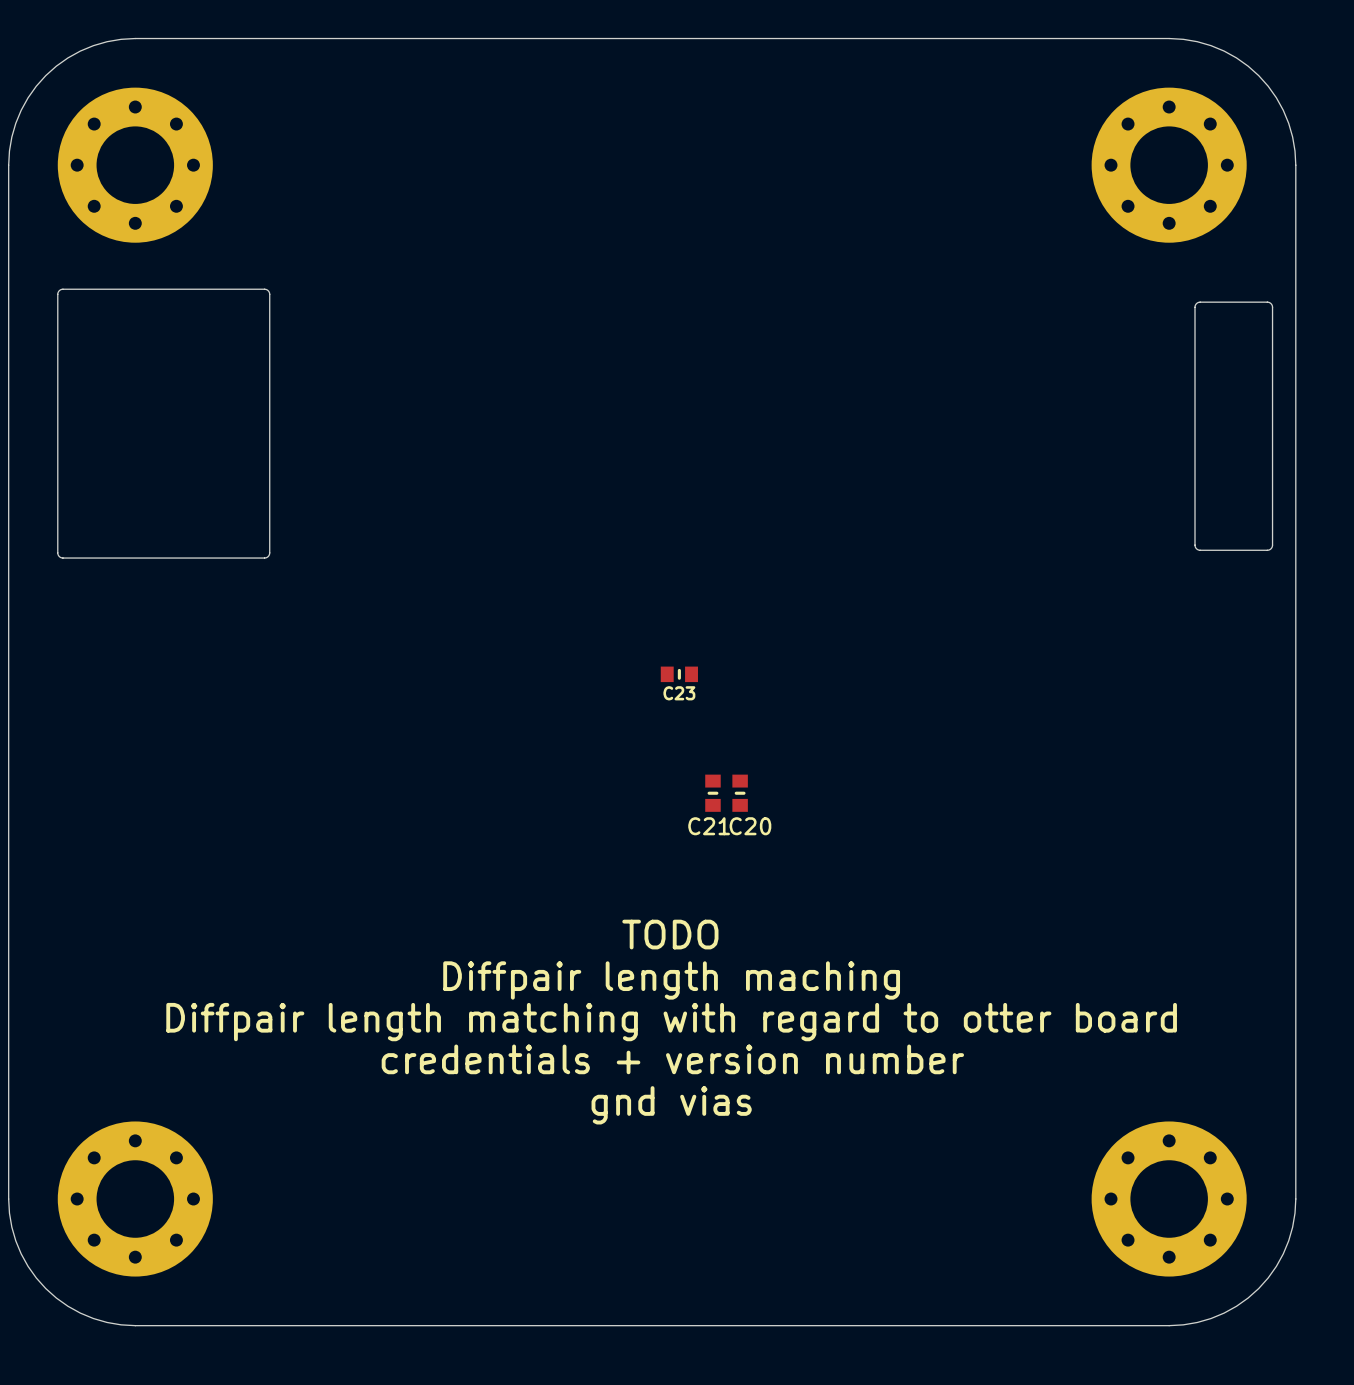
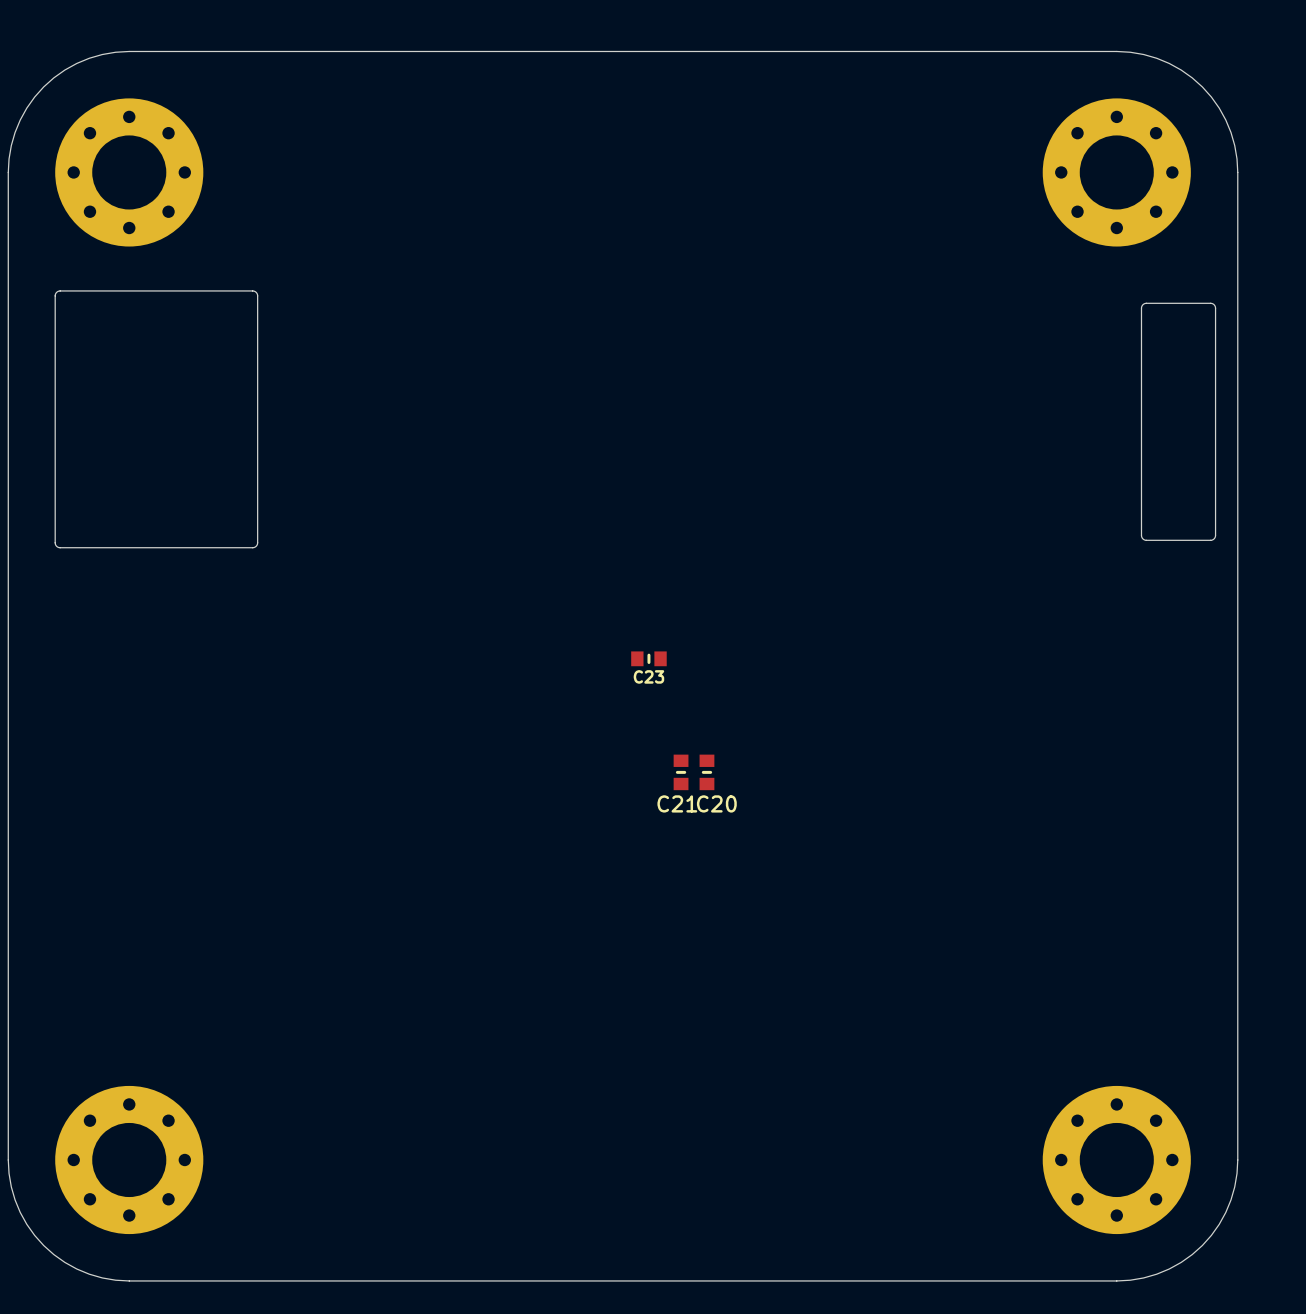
text: TODO (670, 934) -> none
text: Diffpair length maching (671, 980) -> none
text: Diffpair length matching with regard to otter board (671, 1022) -> none
text: credentials + version number (672, 1059) -> none
text: gnd vias (671, 1105) -> none

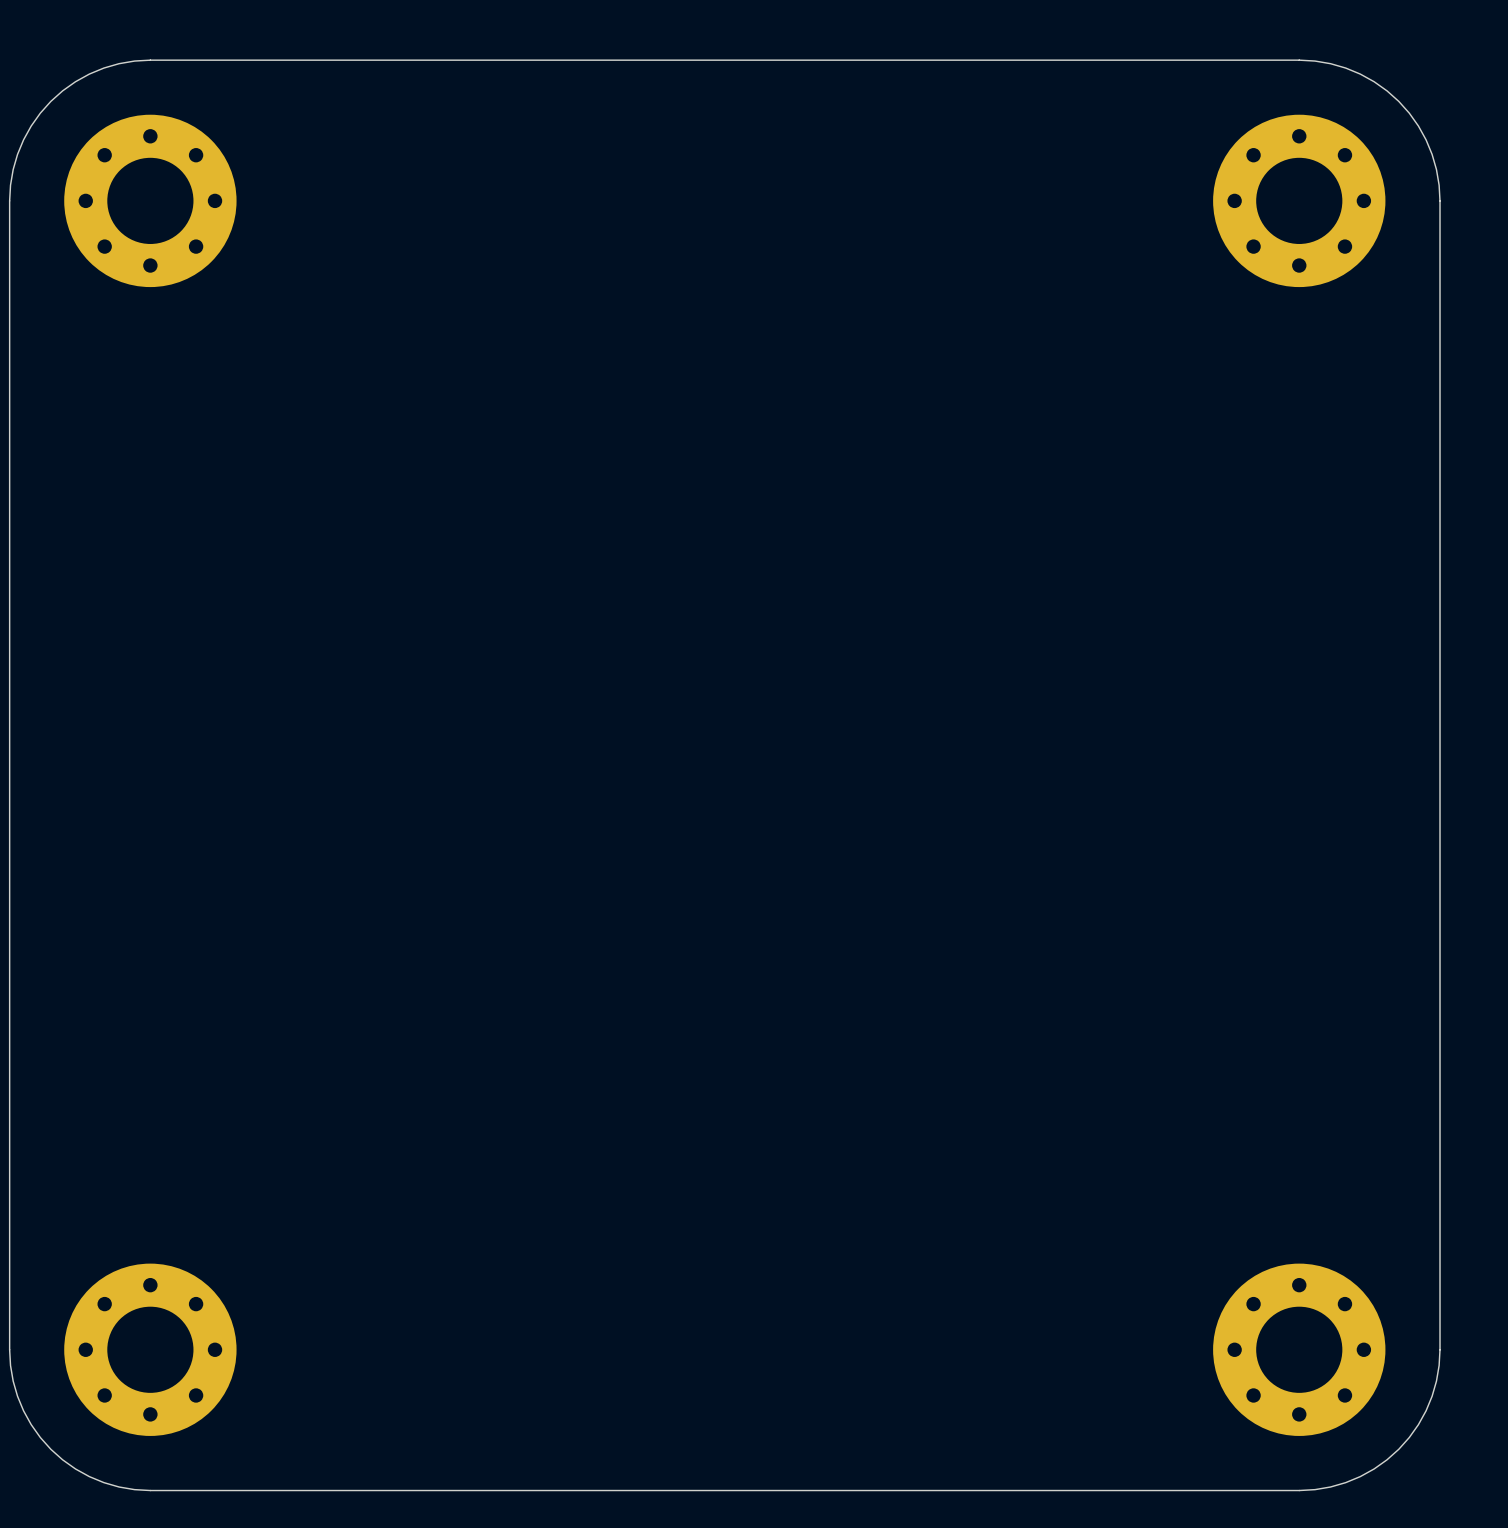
board edge: (60, 290) (252, 290) (256, 292) (257, 542) (255, 546) (60, 547) (56, 545) (55, 295) (60, 290) -> none
board edge: (1146, 303) (1210, 303) (1215, 306) (1215, 535) (1211, 540) (1146, 540) (1141, 536) (1141, 308) (1146, 303) -> none
C23: (648, 658) -> none
C21: (681, 772) -> none
C20: (706, 772) -> none

